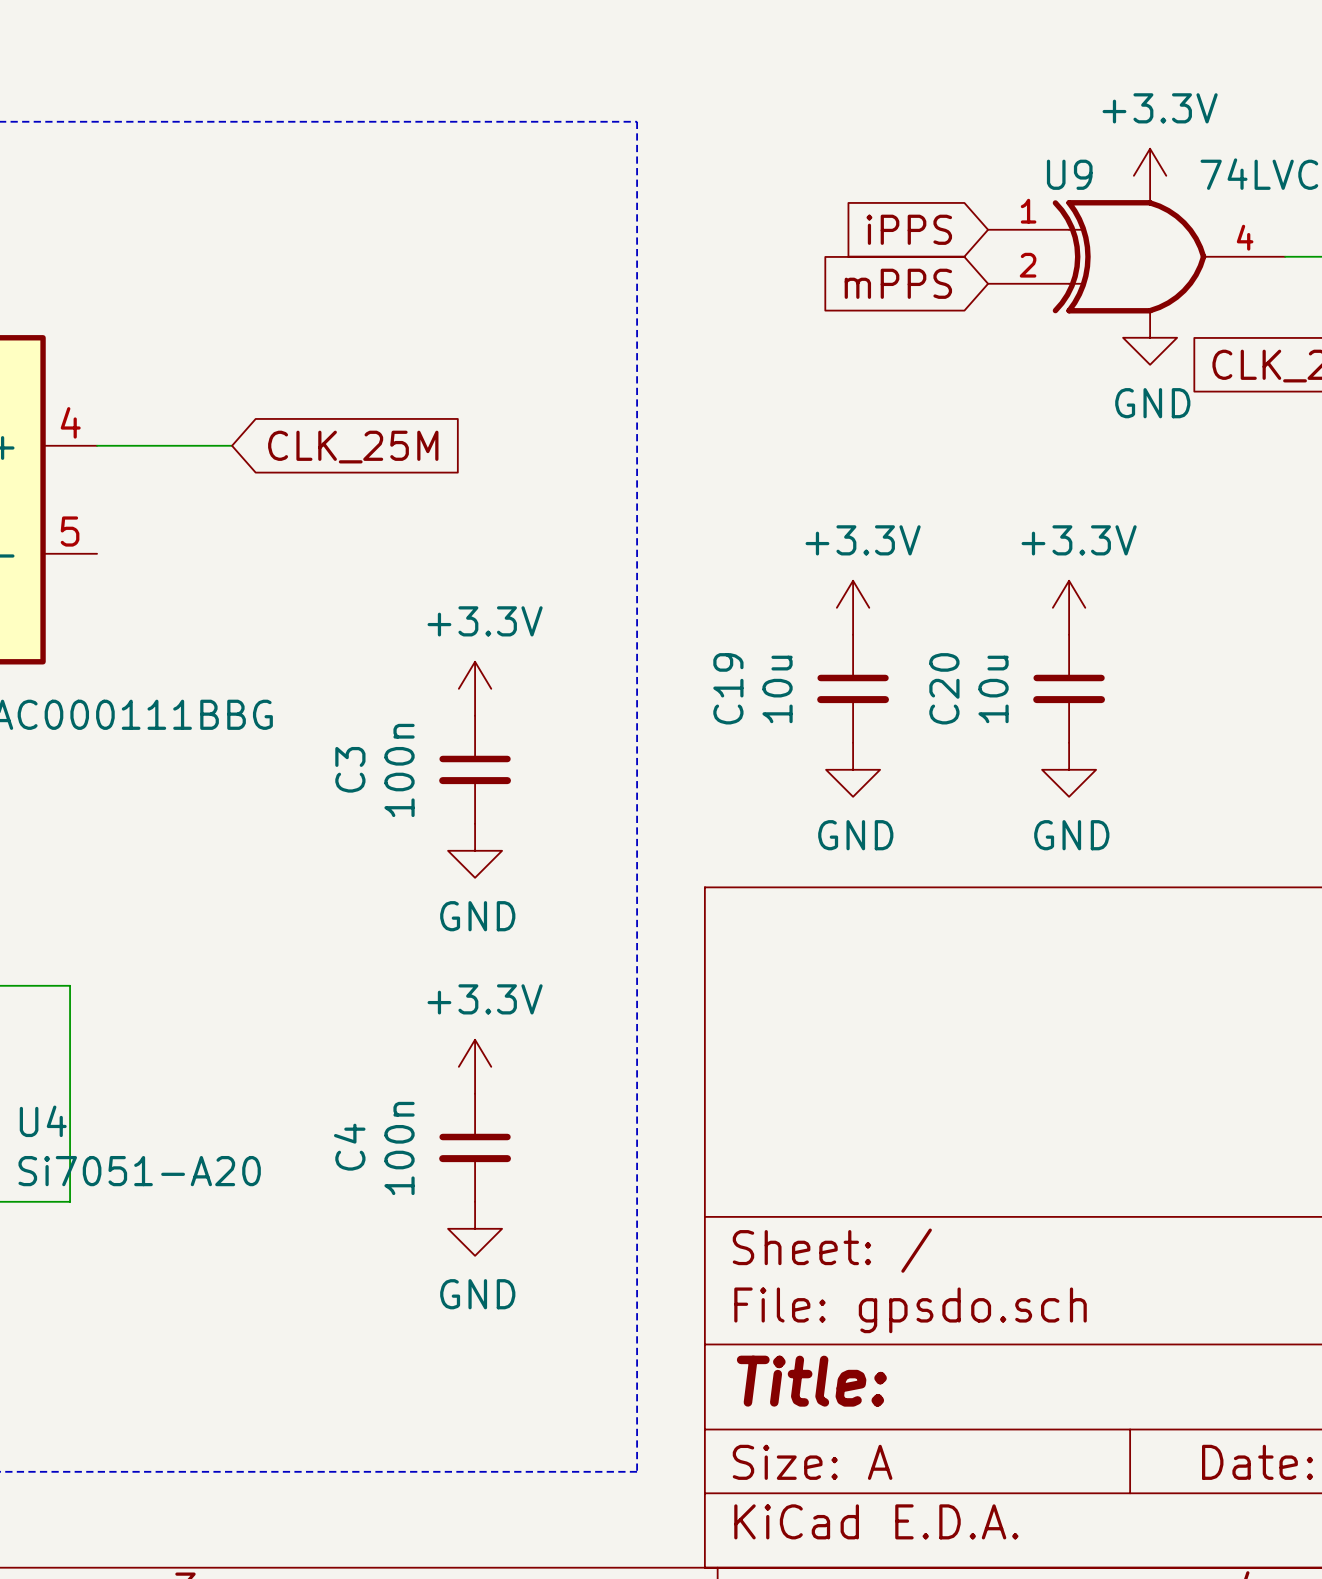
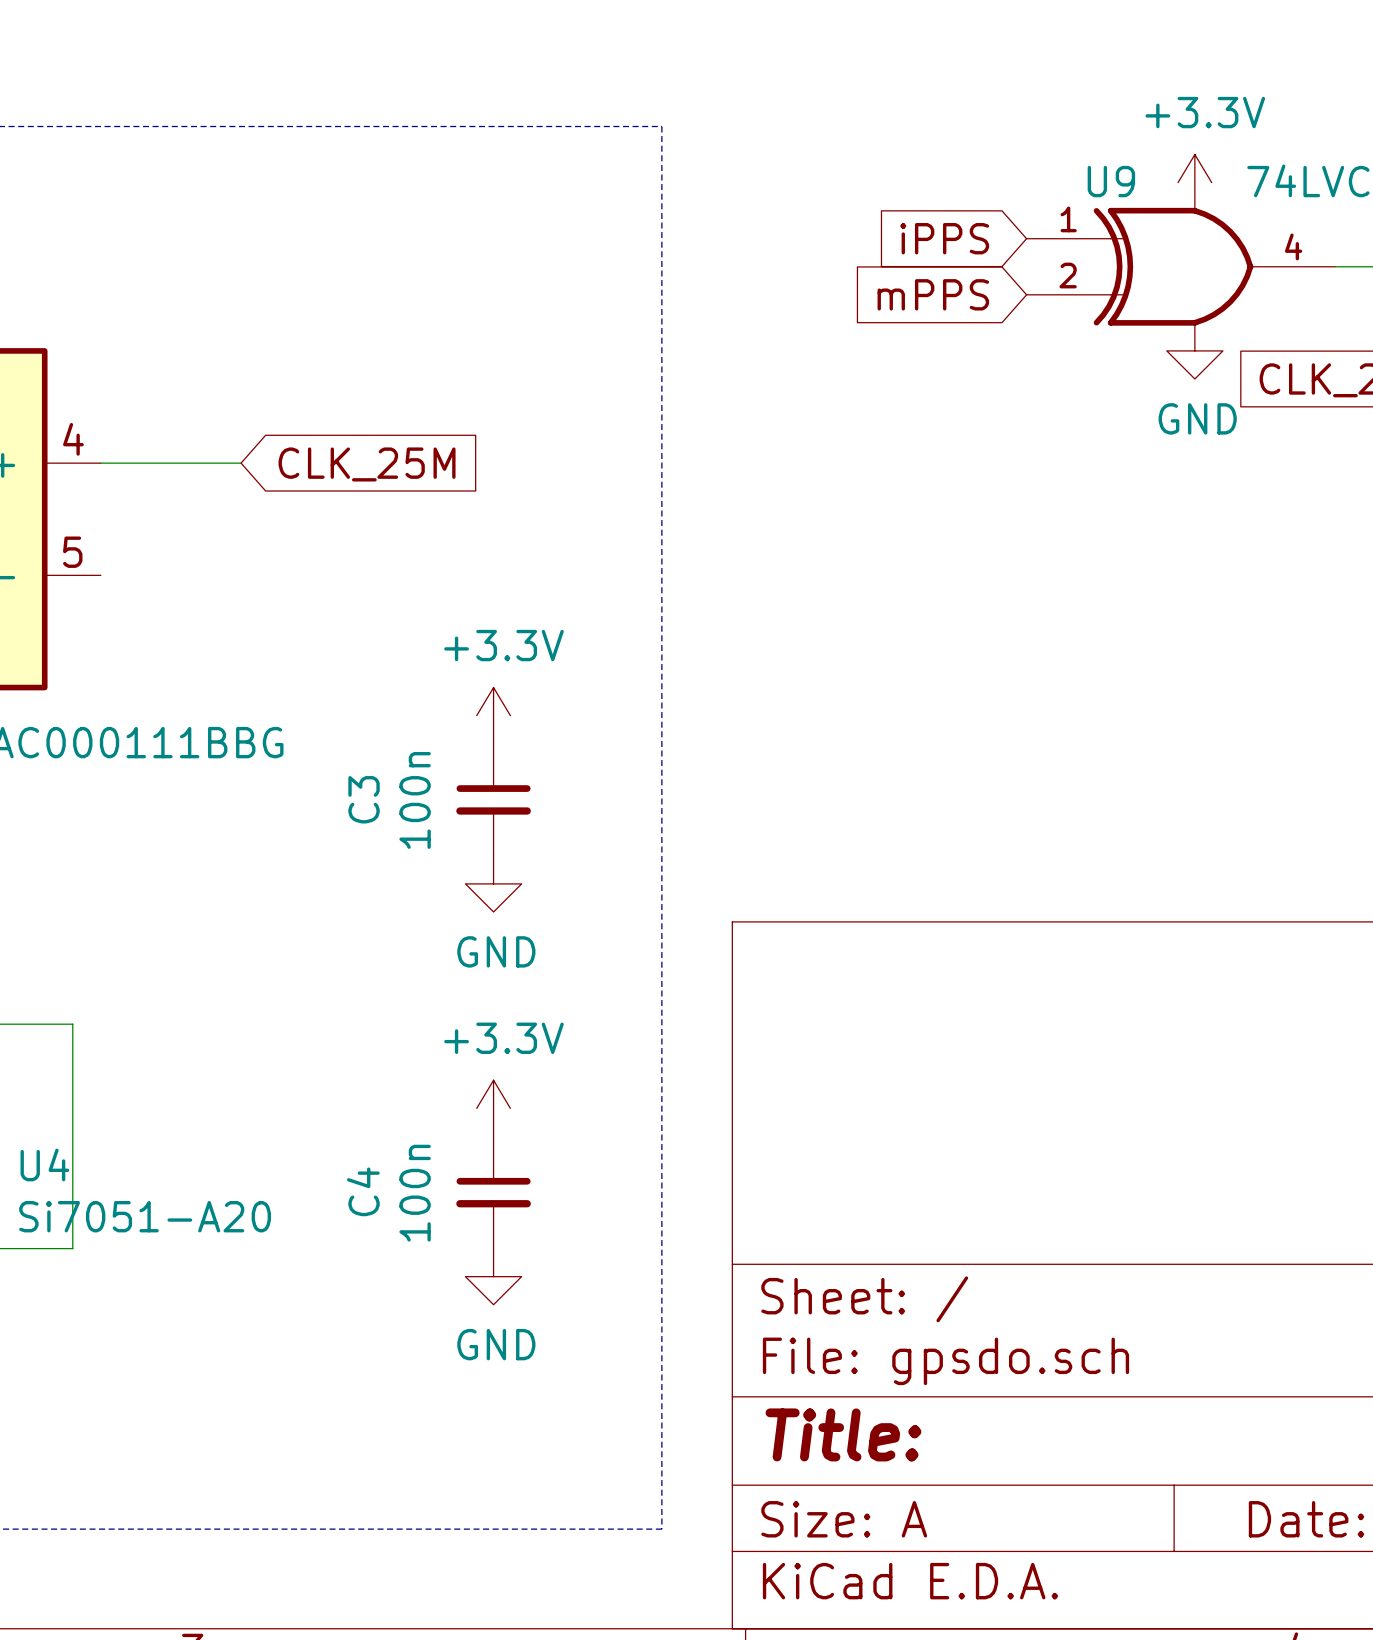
power symbol: +3.3V (853, 607) -> none
power symbol: +3.3V (1069, 607) -> none
C19: 10u (853, 688) -> none
C20: 10u (1069, 688) -> none
power symbol: GND (853, 769) -> none
power symbol: GND (1069, 769) -> none

